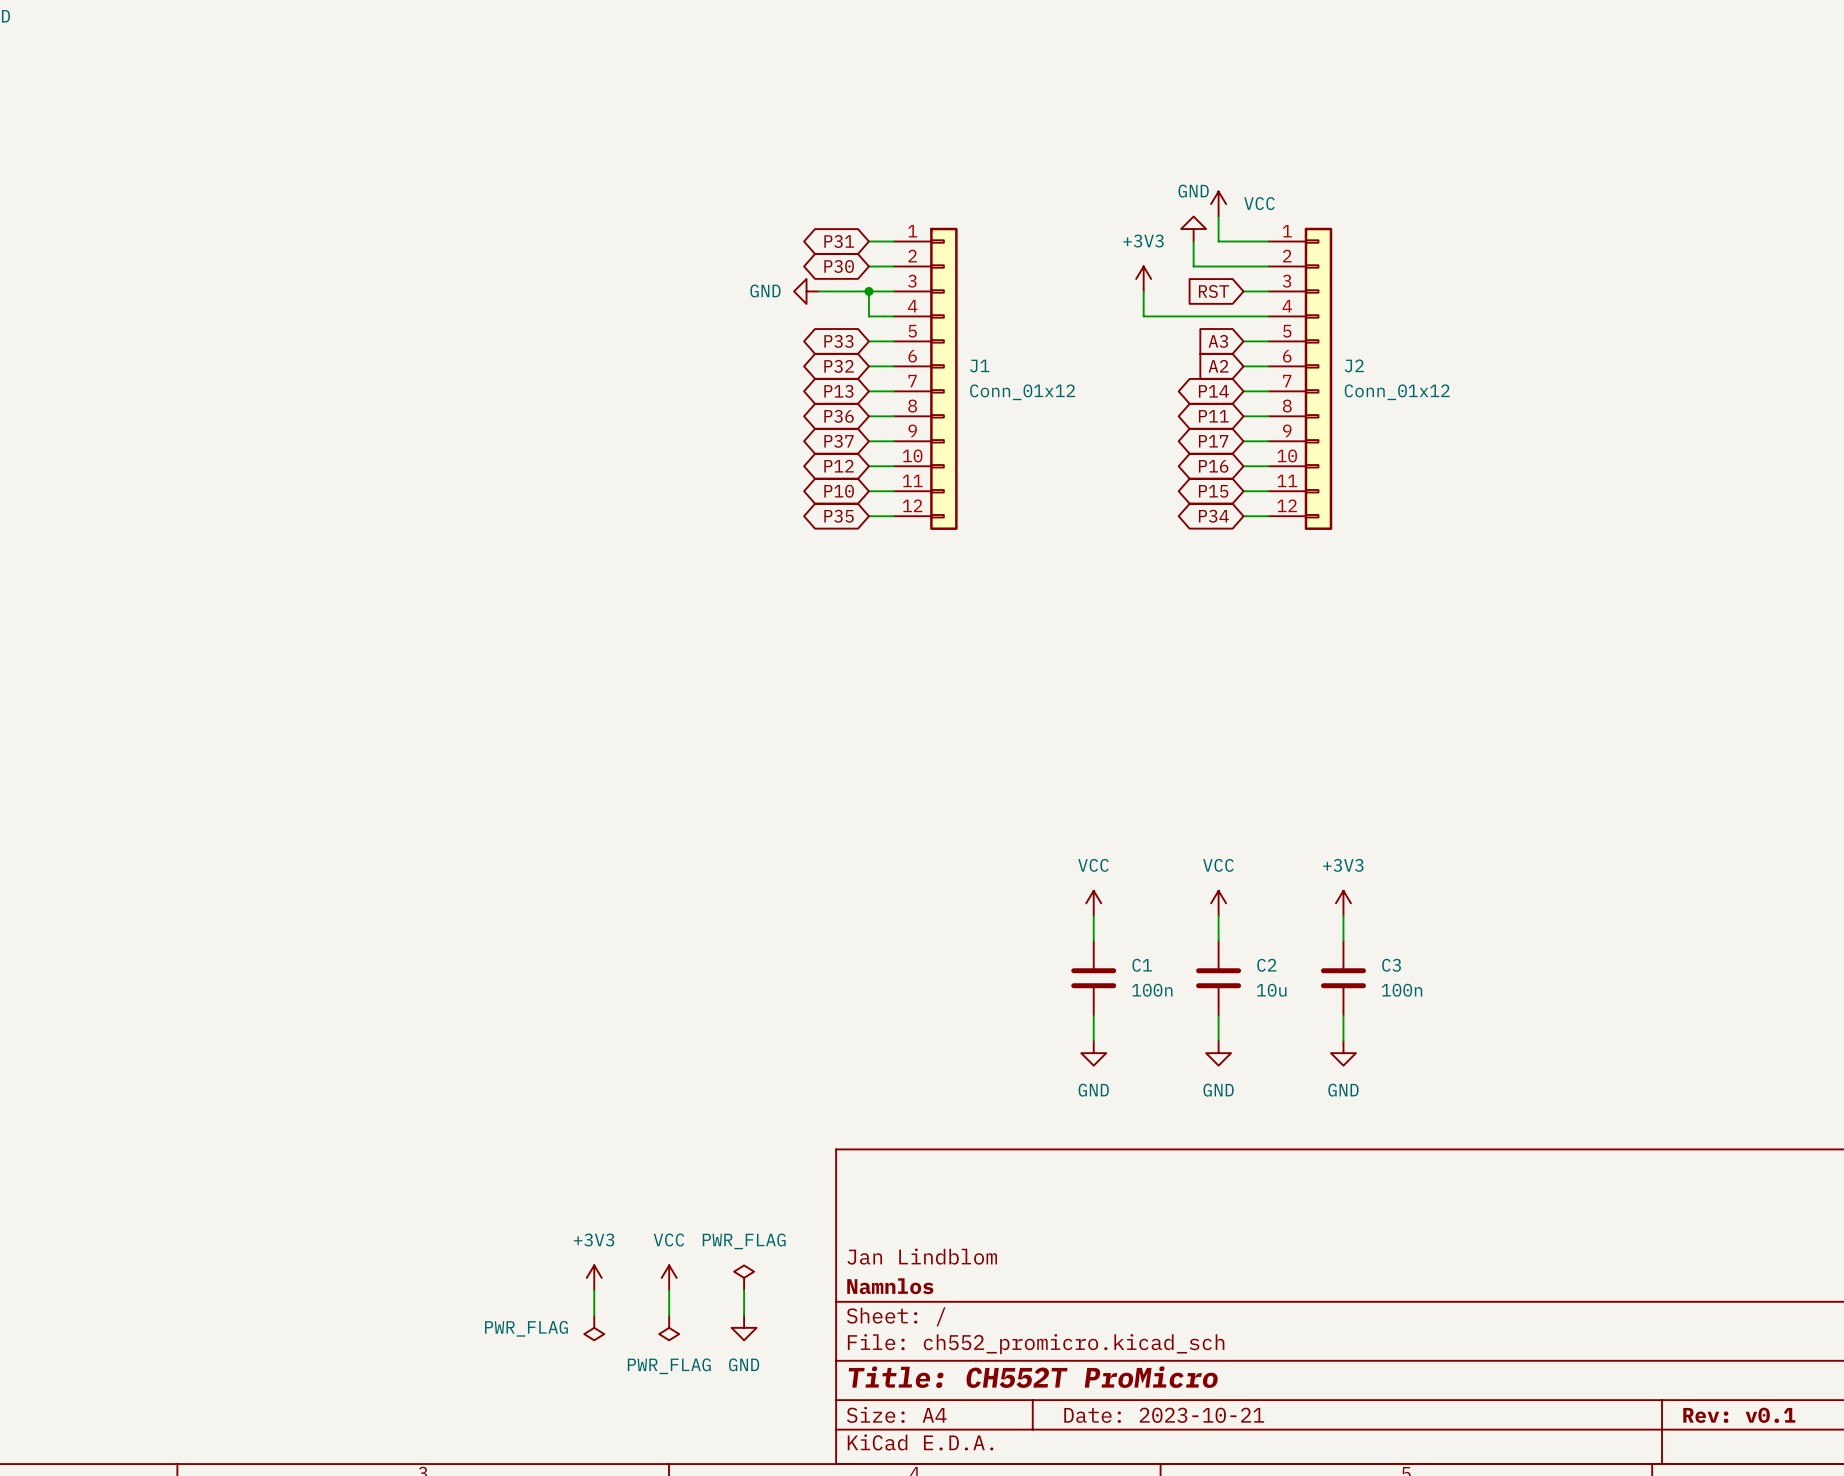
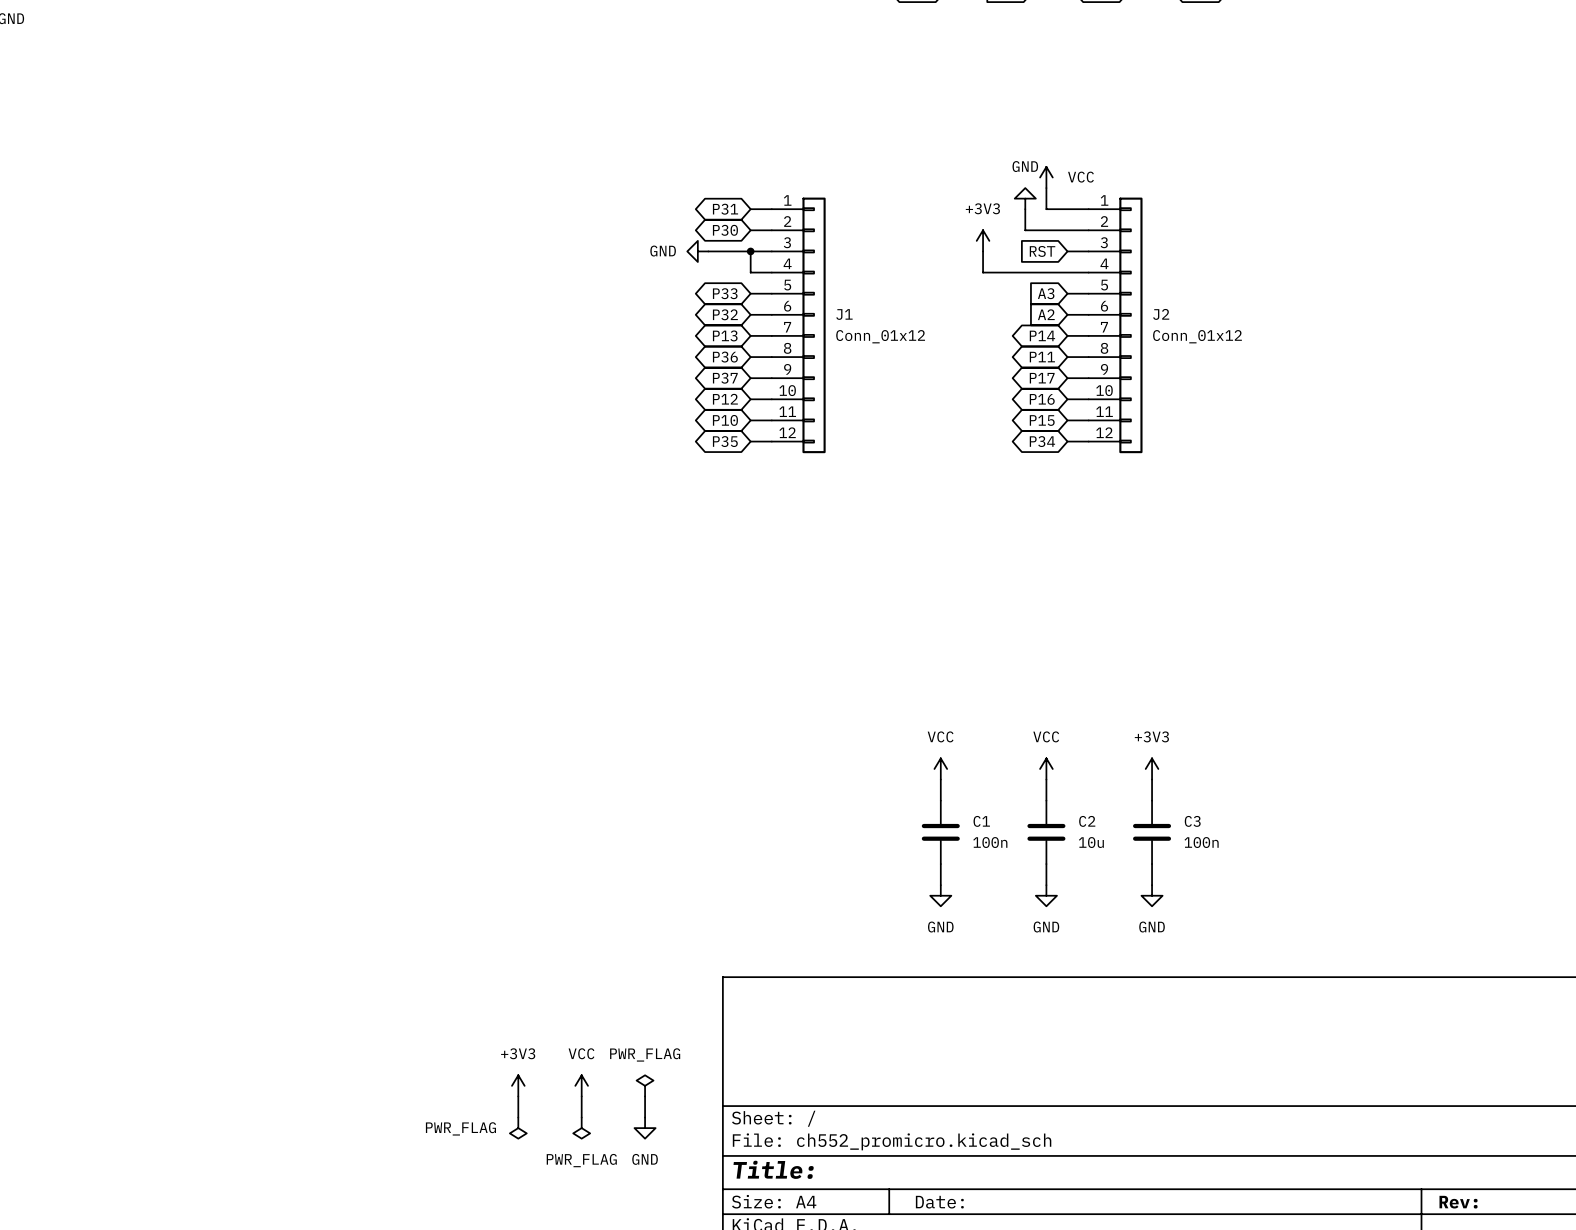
title block: Jan Lindblom (922, 1256) -> none
title block: Namnlos (890, 1286) -> none
title block: Title: CH552T ProMicro (1033, 1377) -> Title: (773, 1169)
title block: Date: 2023-10-21 (1164, 1415) -> Date: (939, 1202)
title block: Rev: v0.1 (1739, 1415) -> Rev: (1458, 1202)

